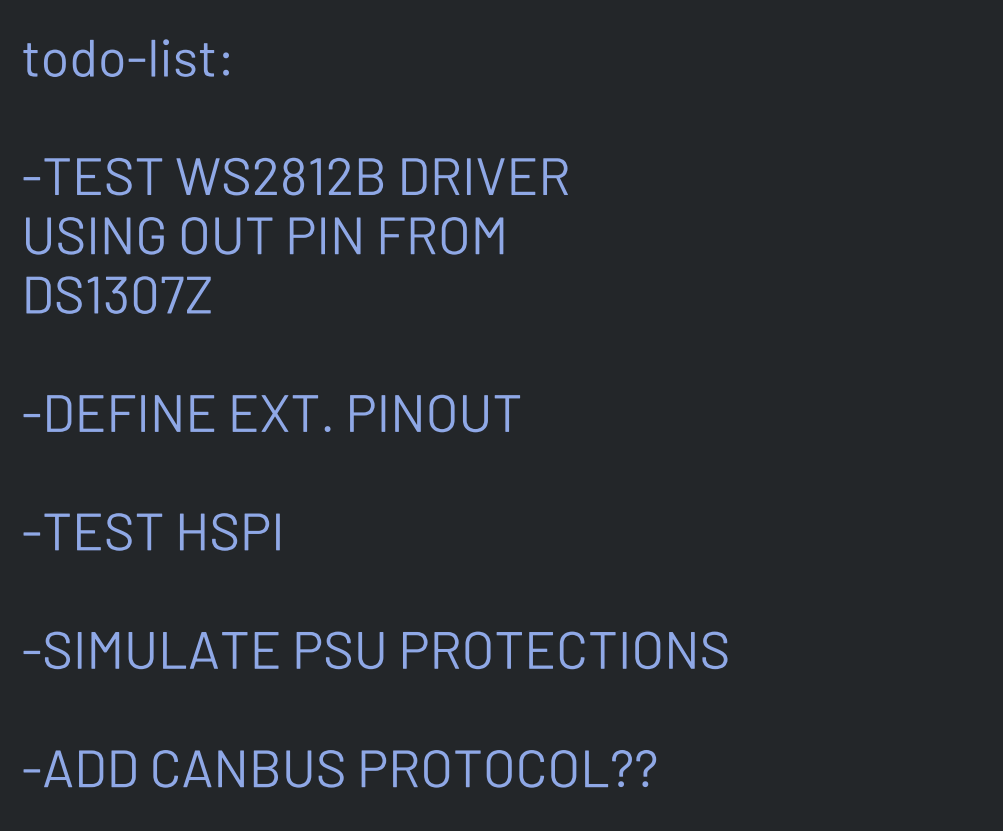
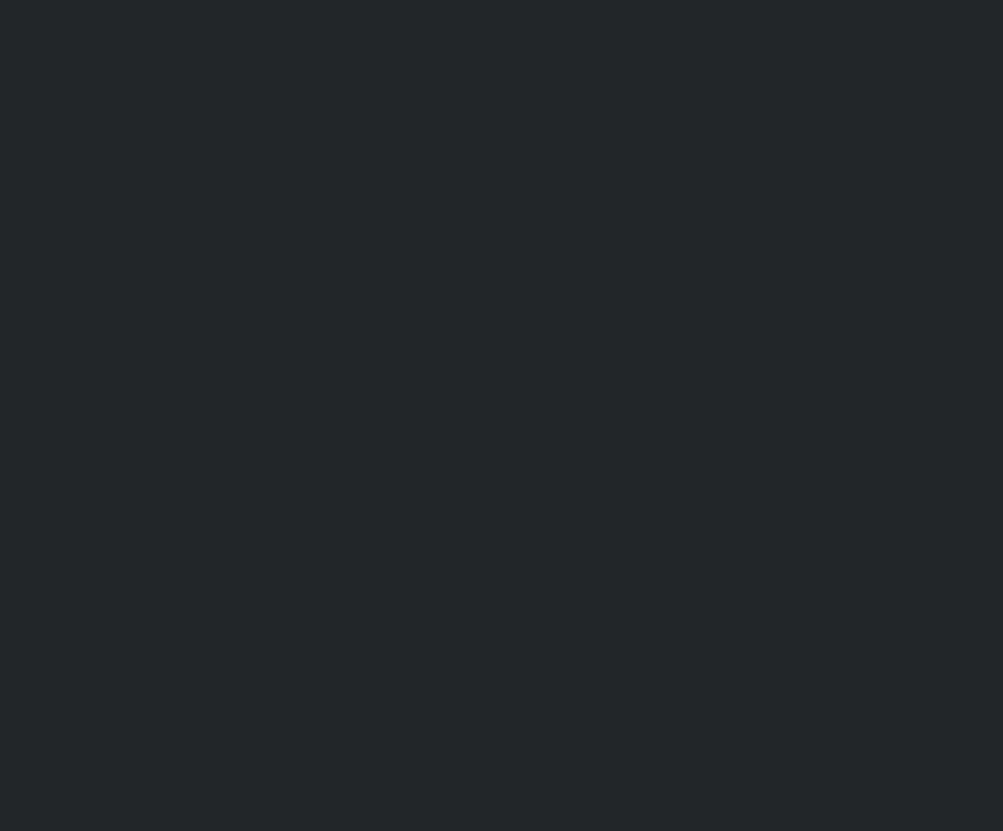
text: todo-list: (126, 58) -> none
text: -TEST WS2812B DRIVER (295, 176) -> none
text: USING OUT PIN FROM (264, 235) -> none
text: DS1307Z (118, 295) -> none
text: -DEFINE EXT. PINOUT (271, 413) -> none
text: -TEST HSPI (151, 531) -> none
text: -SIMULATE PSU PROTECTIONS (375, 650) -> none
text: -ADD CANBUS PROTOCOL?? (339, 768) -> none

